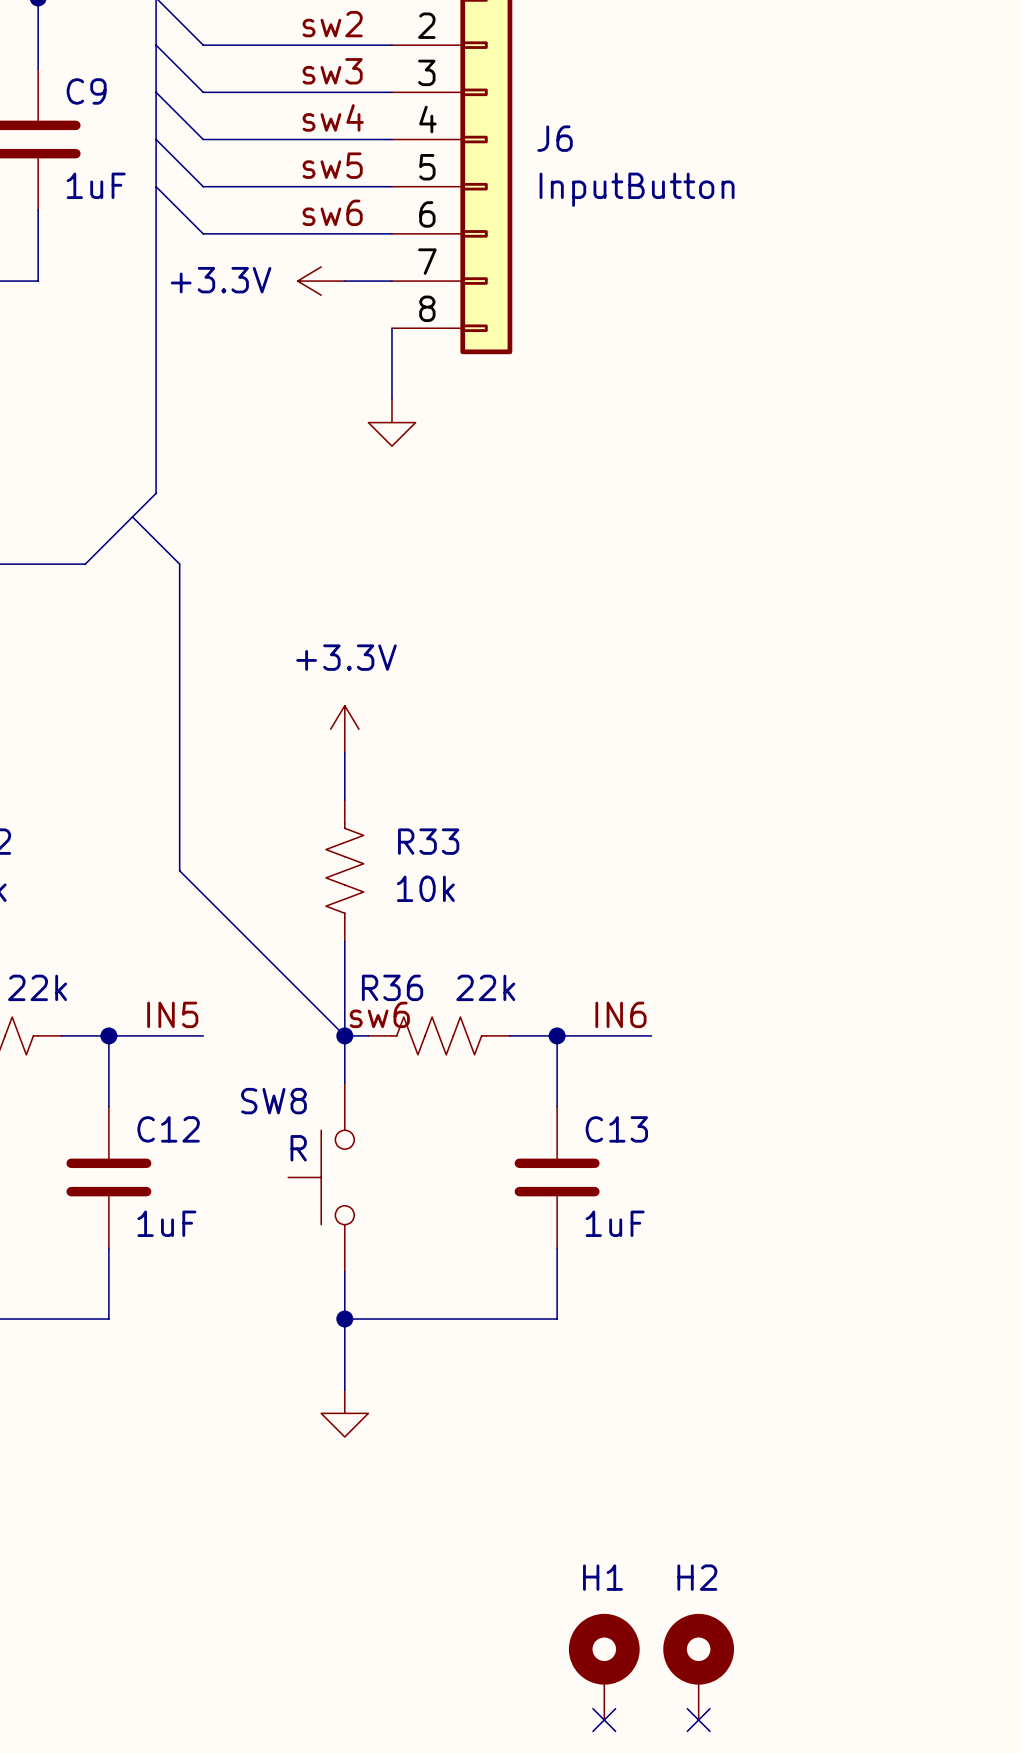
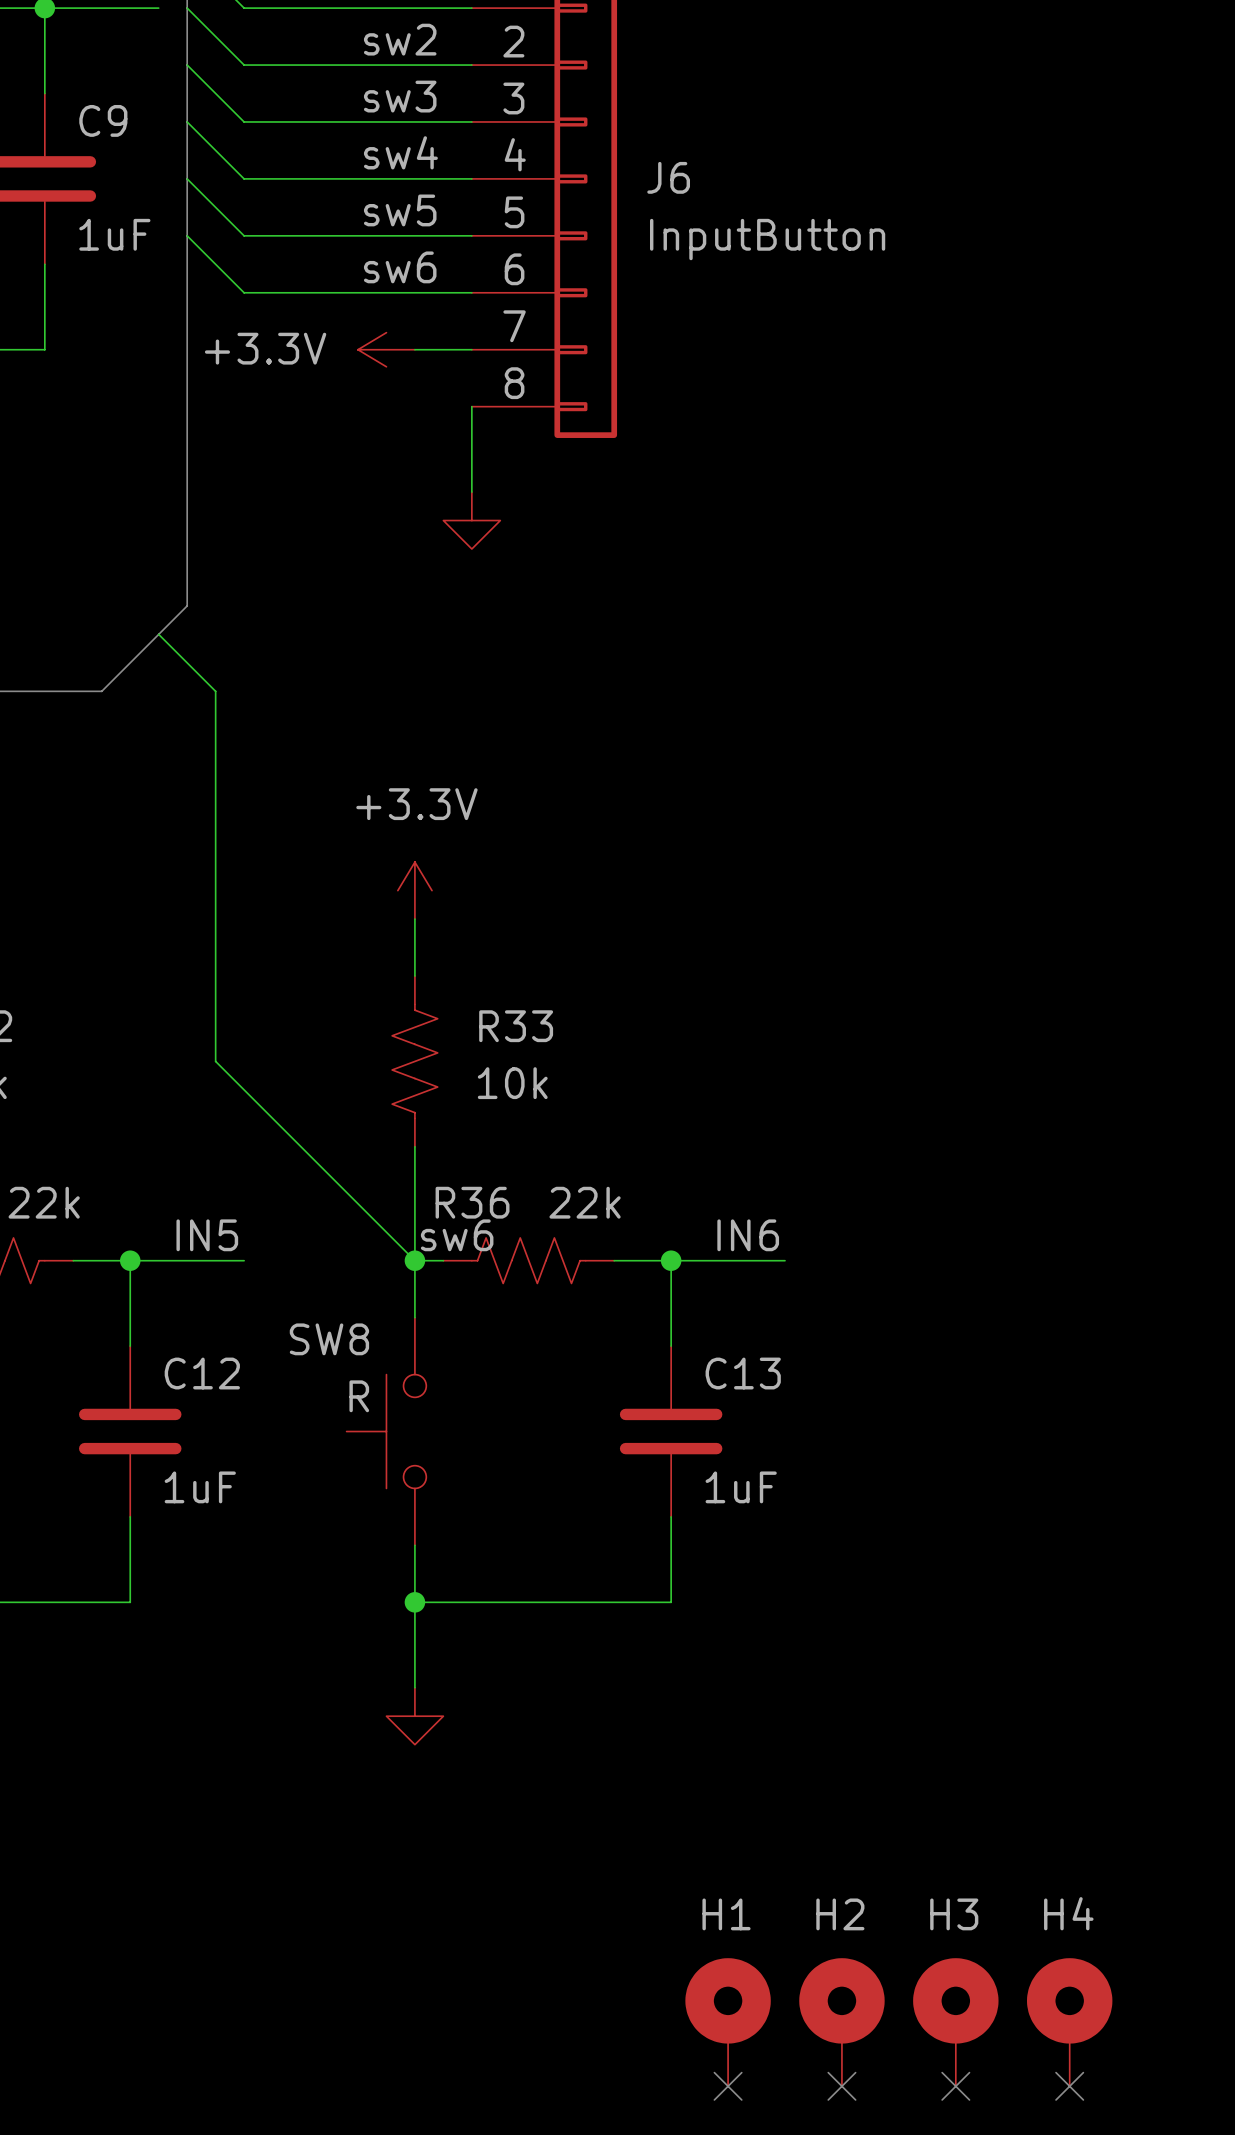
H3: none -> (955, 2022)
H4: none -> (1069, 2022)
no-connect mark: none -> (955, 2086)
no-connect mark: none -> (1069, 2086)

